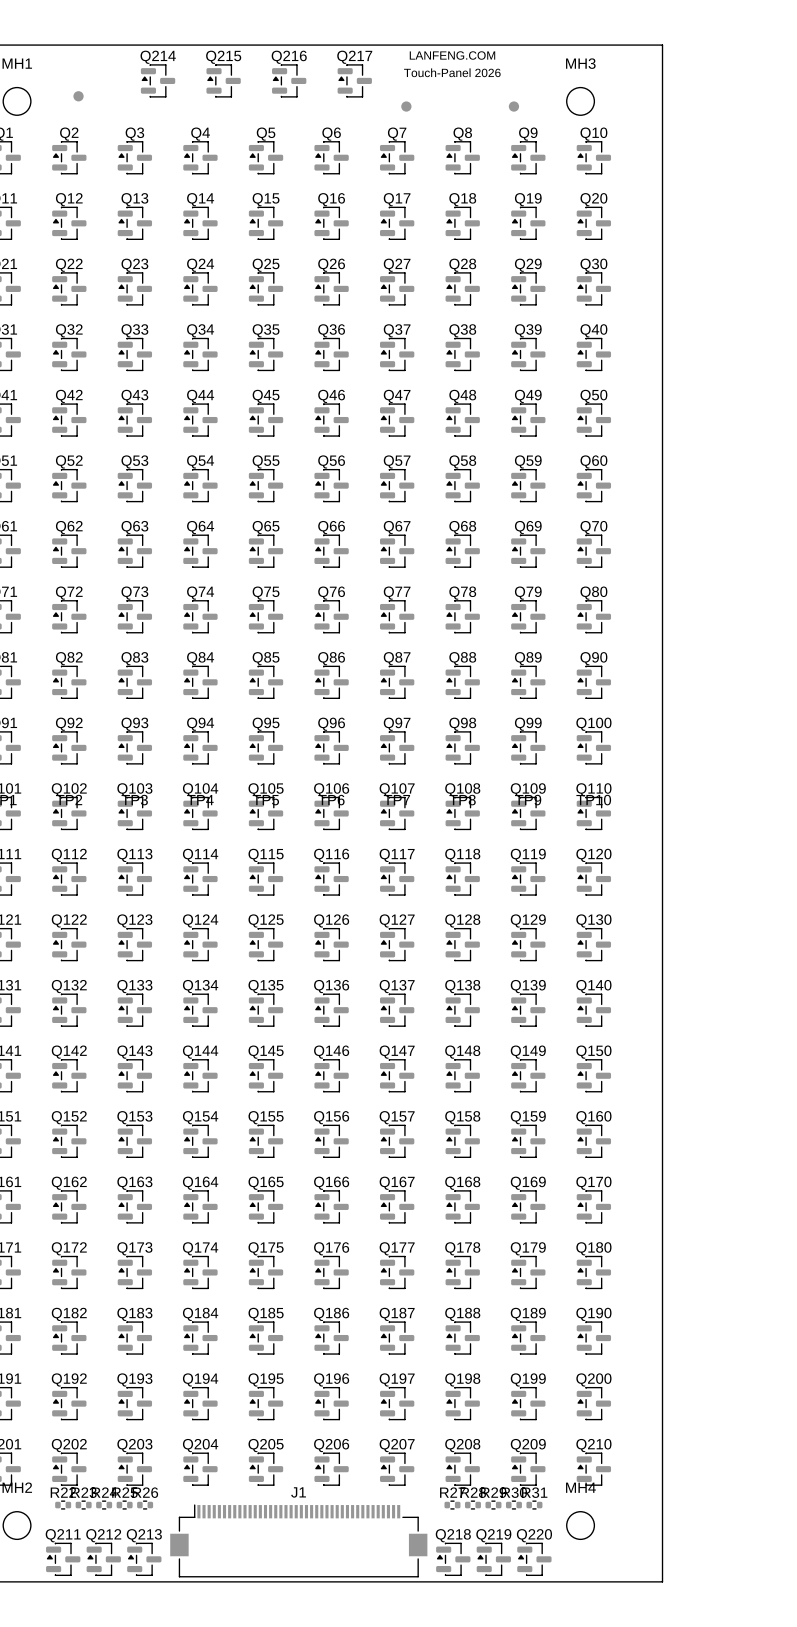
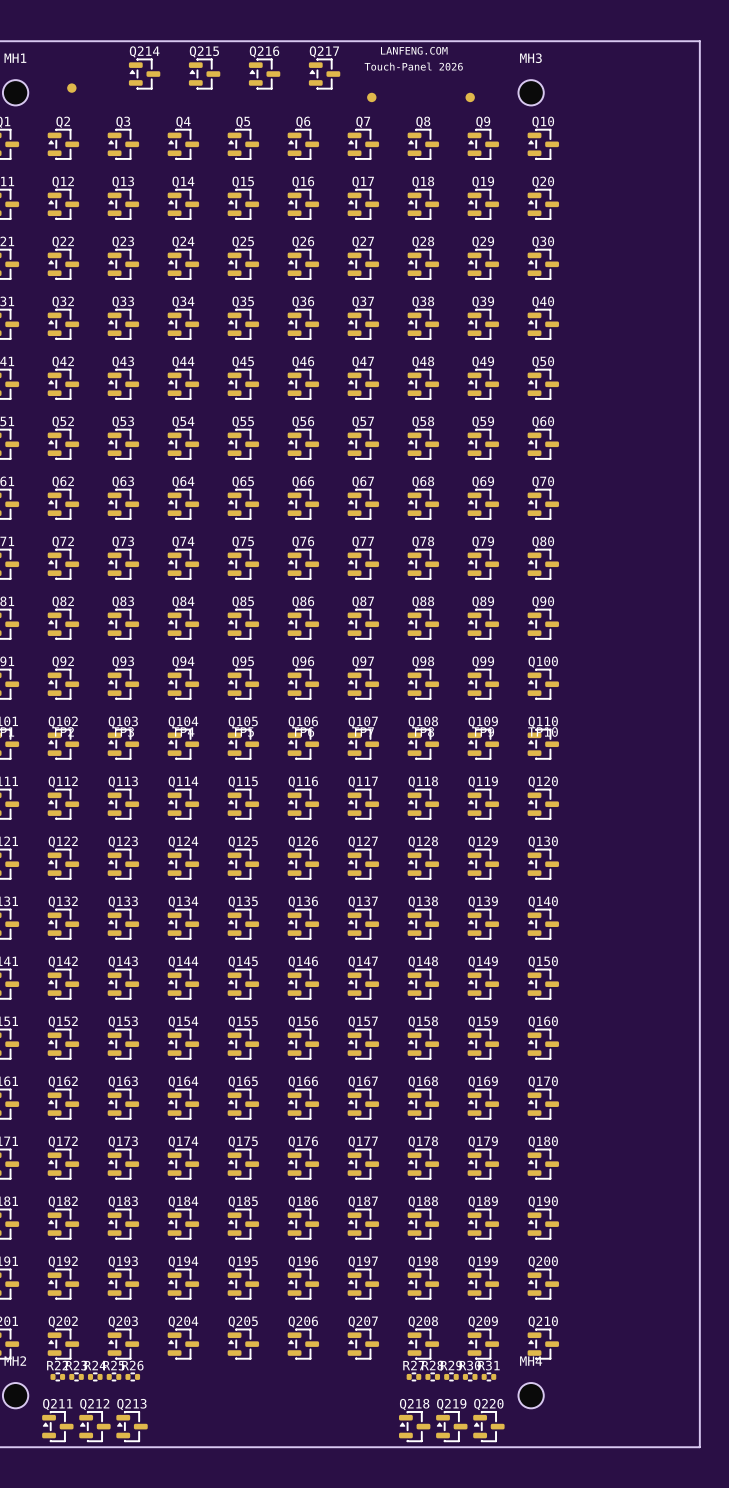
board edge: (662, 45) (662, 1581) -> (606, 41) (699, 41) (699, 1447) (606, 1447)
J1: (298, 1540) -> none

